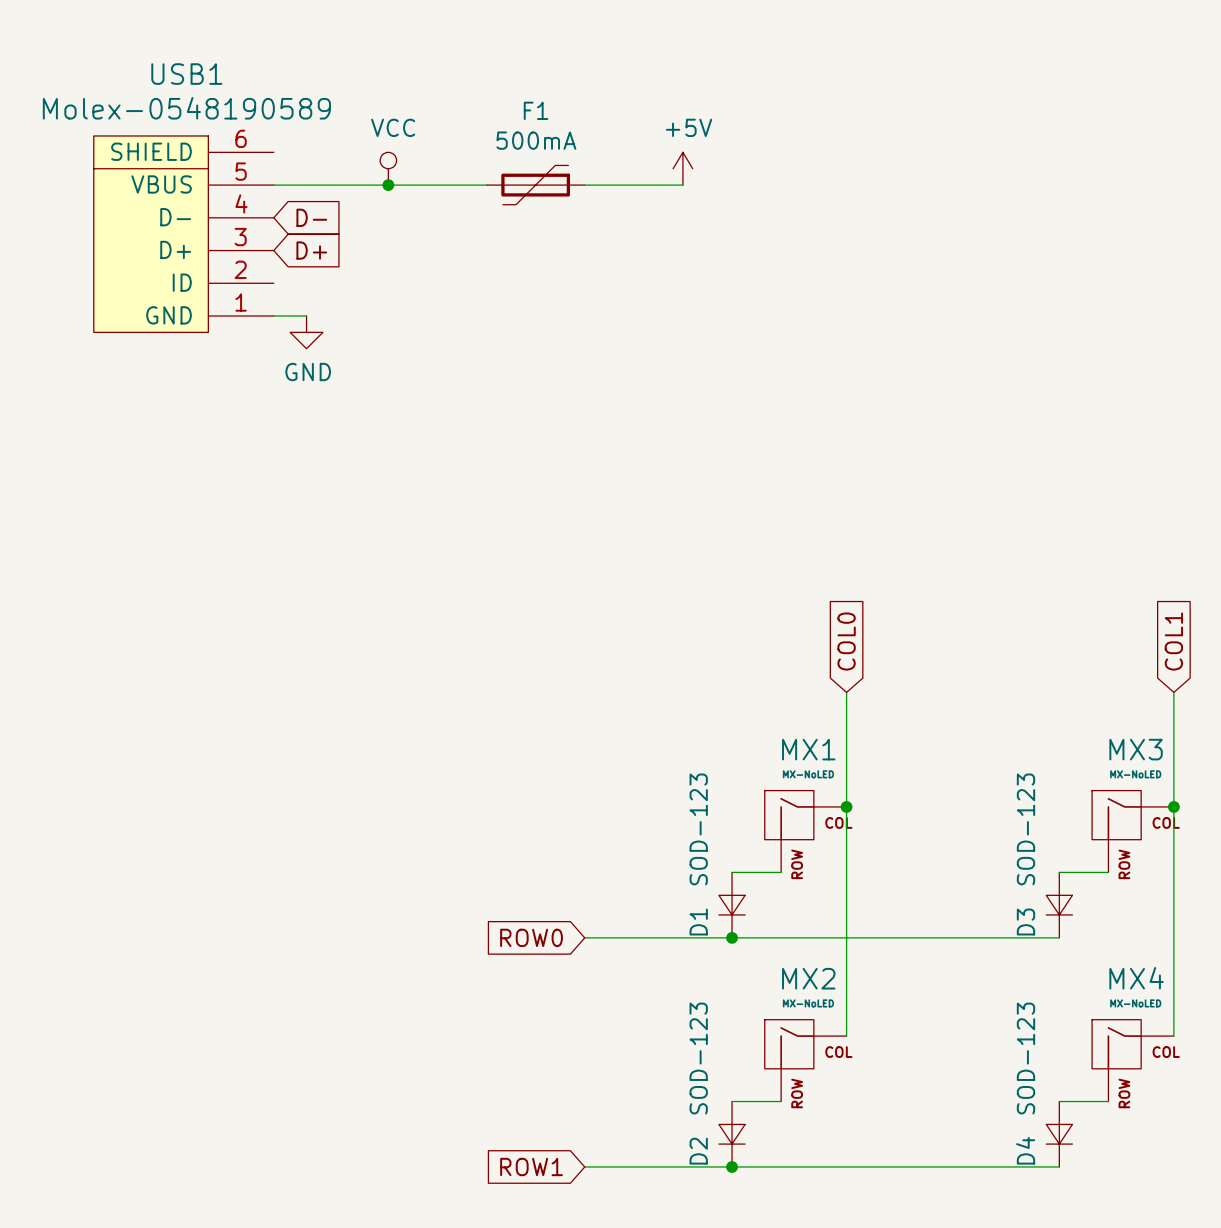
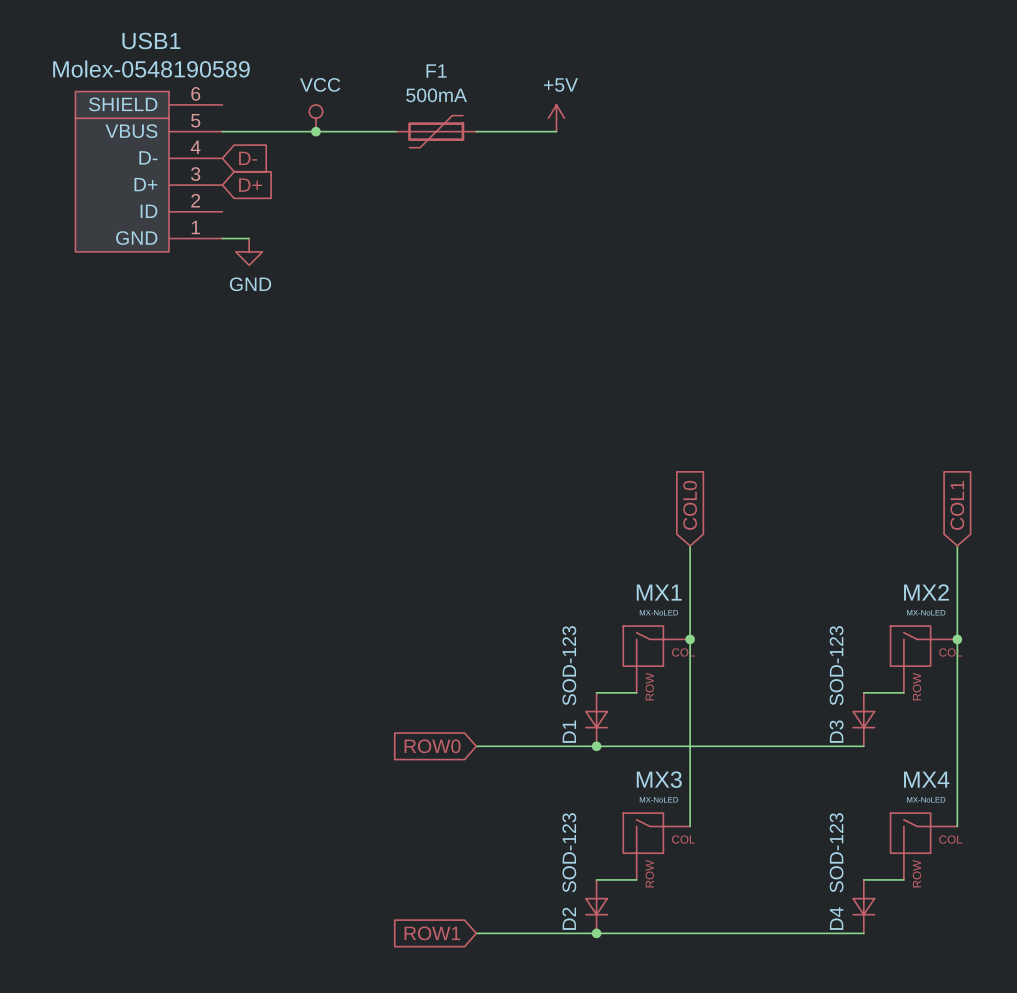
MX3 name: MX3 (1136, 749) -> MX2 (926, 592)
MX2 name: MX2 (808, 978) -> MX3 (659, 779)

